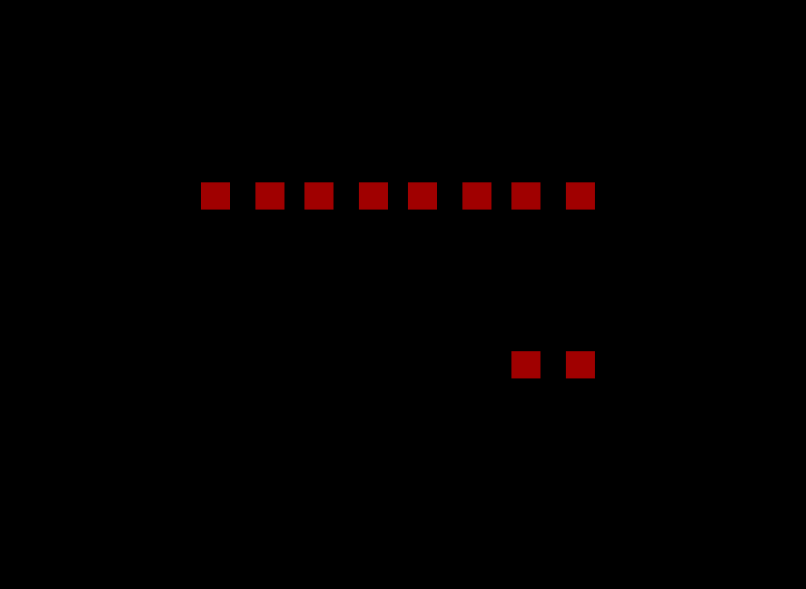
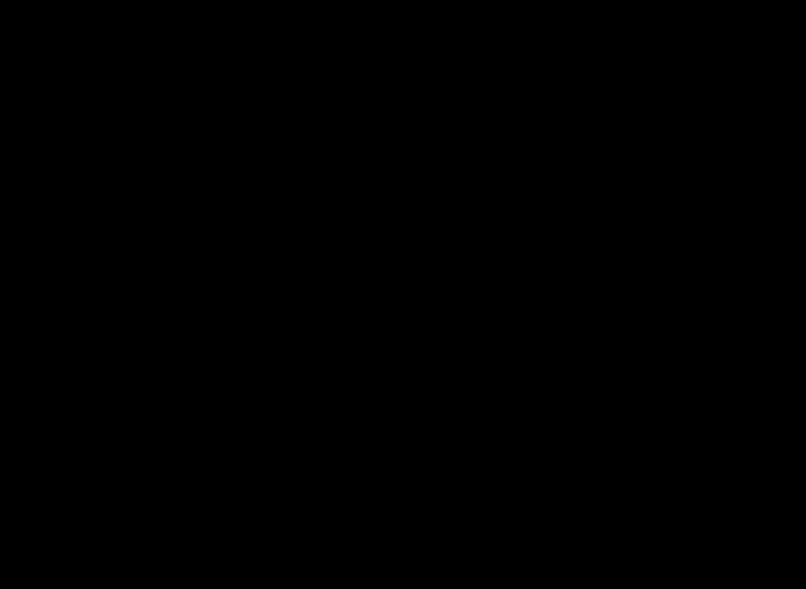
part: (242, 195) -> none
part: (346, 195) -> none
part: (449, 195) -> none
part: (553, 195) -> none
part: (553, 364) -> none

